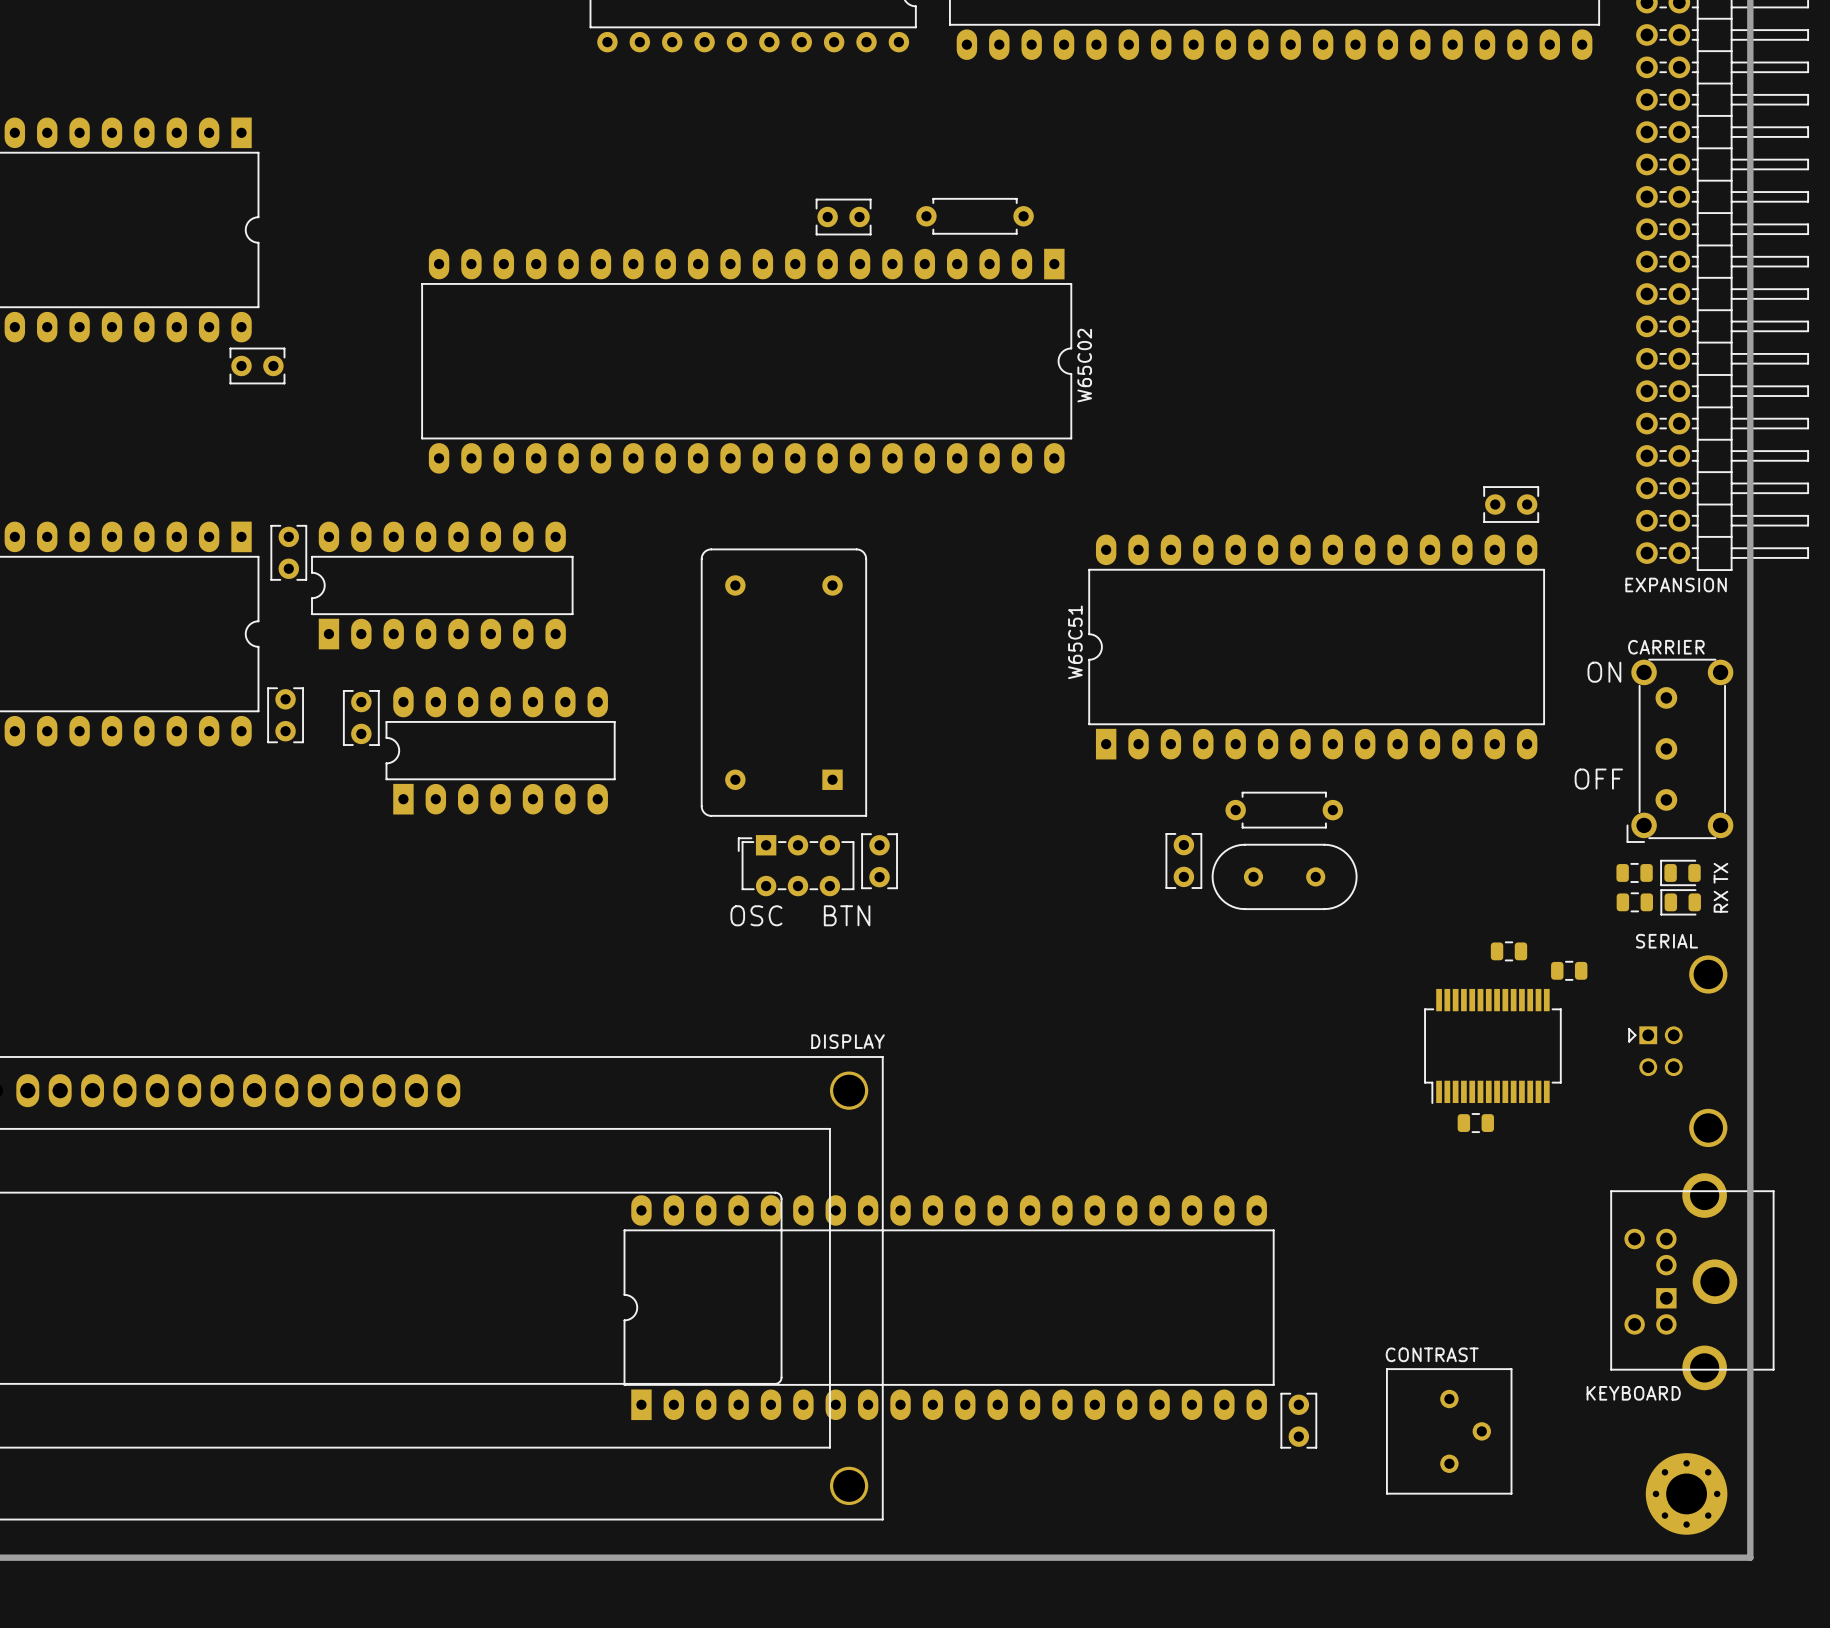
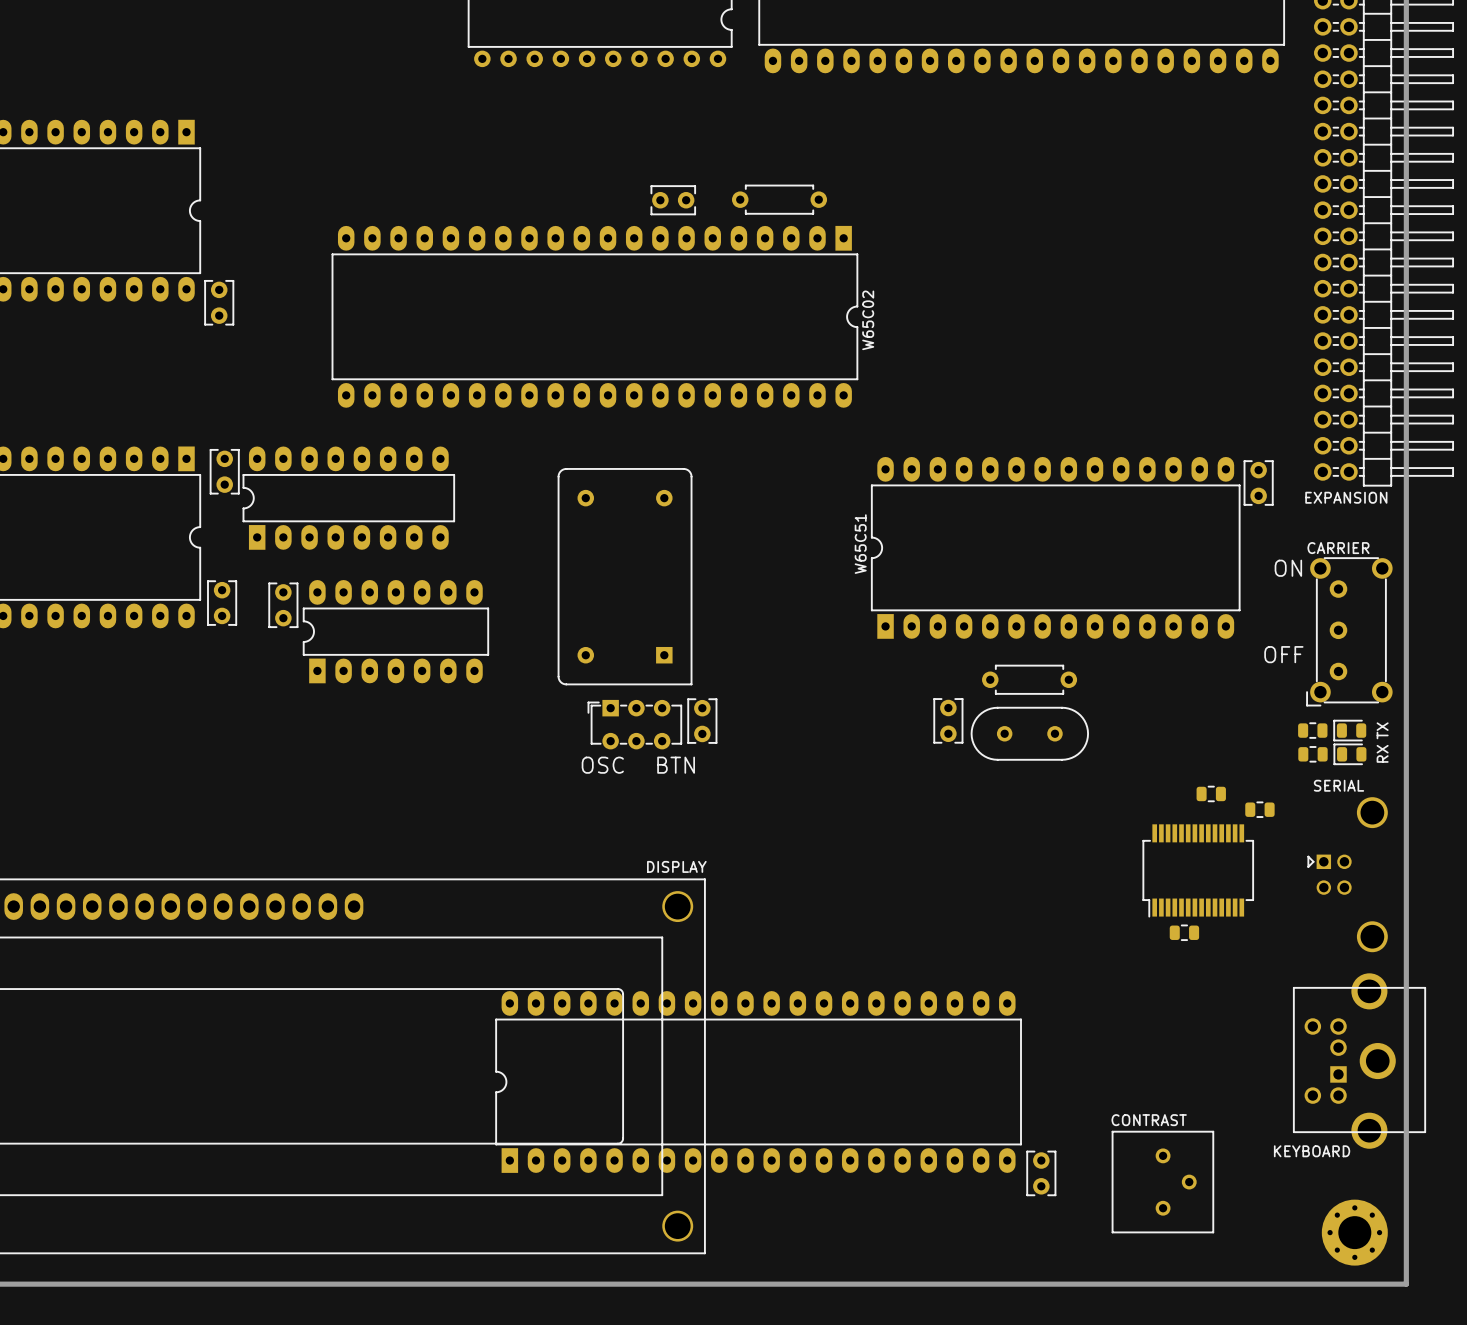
part rotation: 0° (257, 365) -> 90° clockwise (219, 302)
part rotation: 0° (1511, 504) -> 90° clockwise (1258, 483)
part position: (1511, 504) -> (1258, 483)

